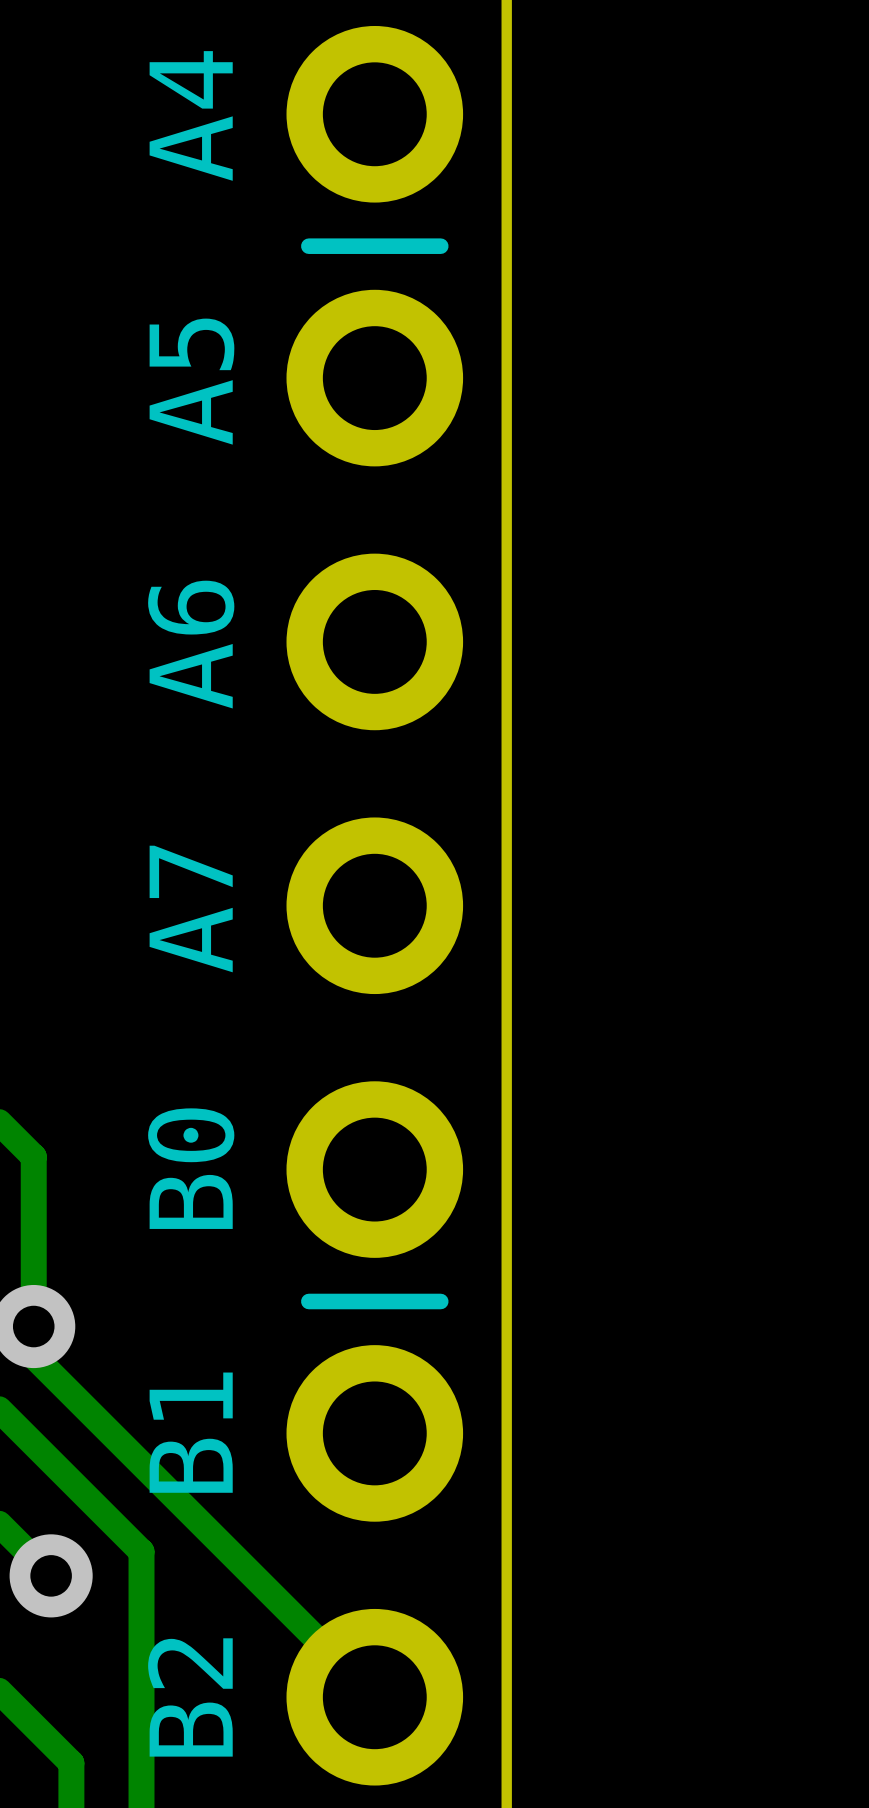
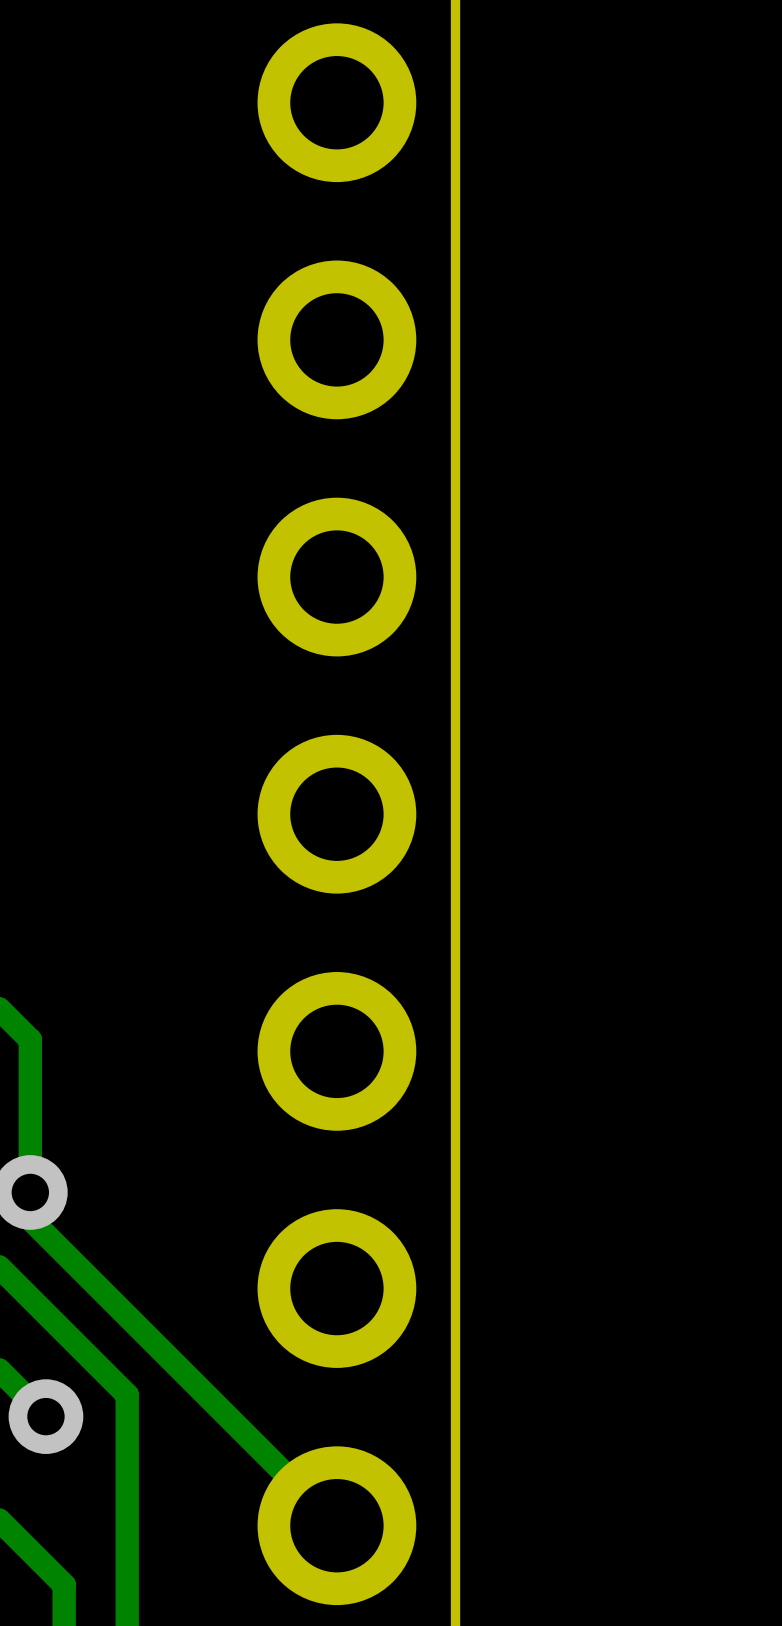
text: A4 (191, 115) -> none
line: (440, 246) (308, 246) -> none
text: A5 (191, 381) -> none
text: A6 (191, 644) -> none
text: A7 (191, 909) -> none
text: B0 (191, 1168) -> none
line: (440, 1301) (308, 1301) -> none
text: B1 (191, 1432) -> none
text: B2 (190, 1697) -> none

